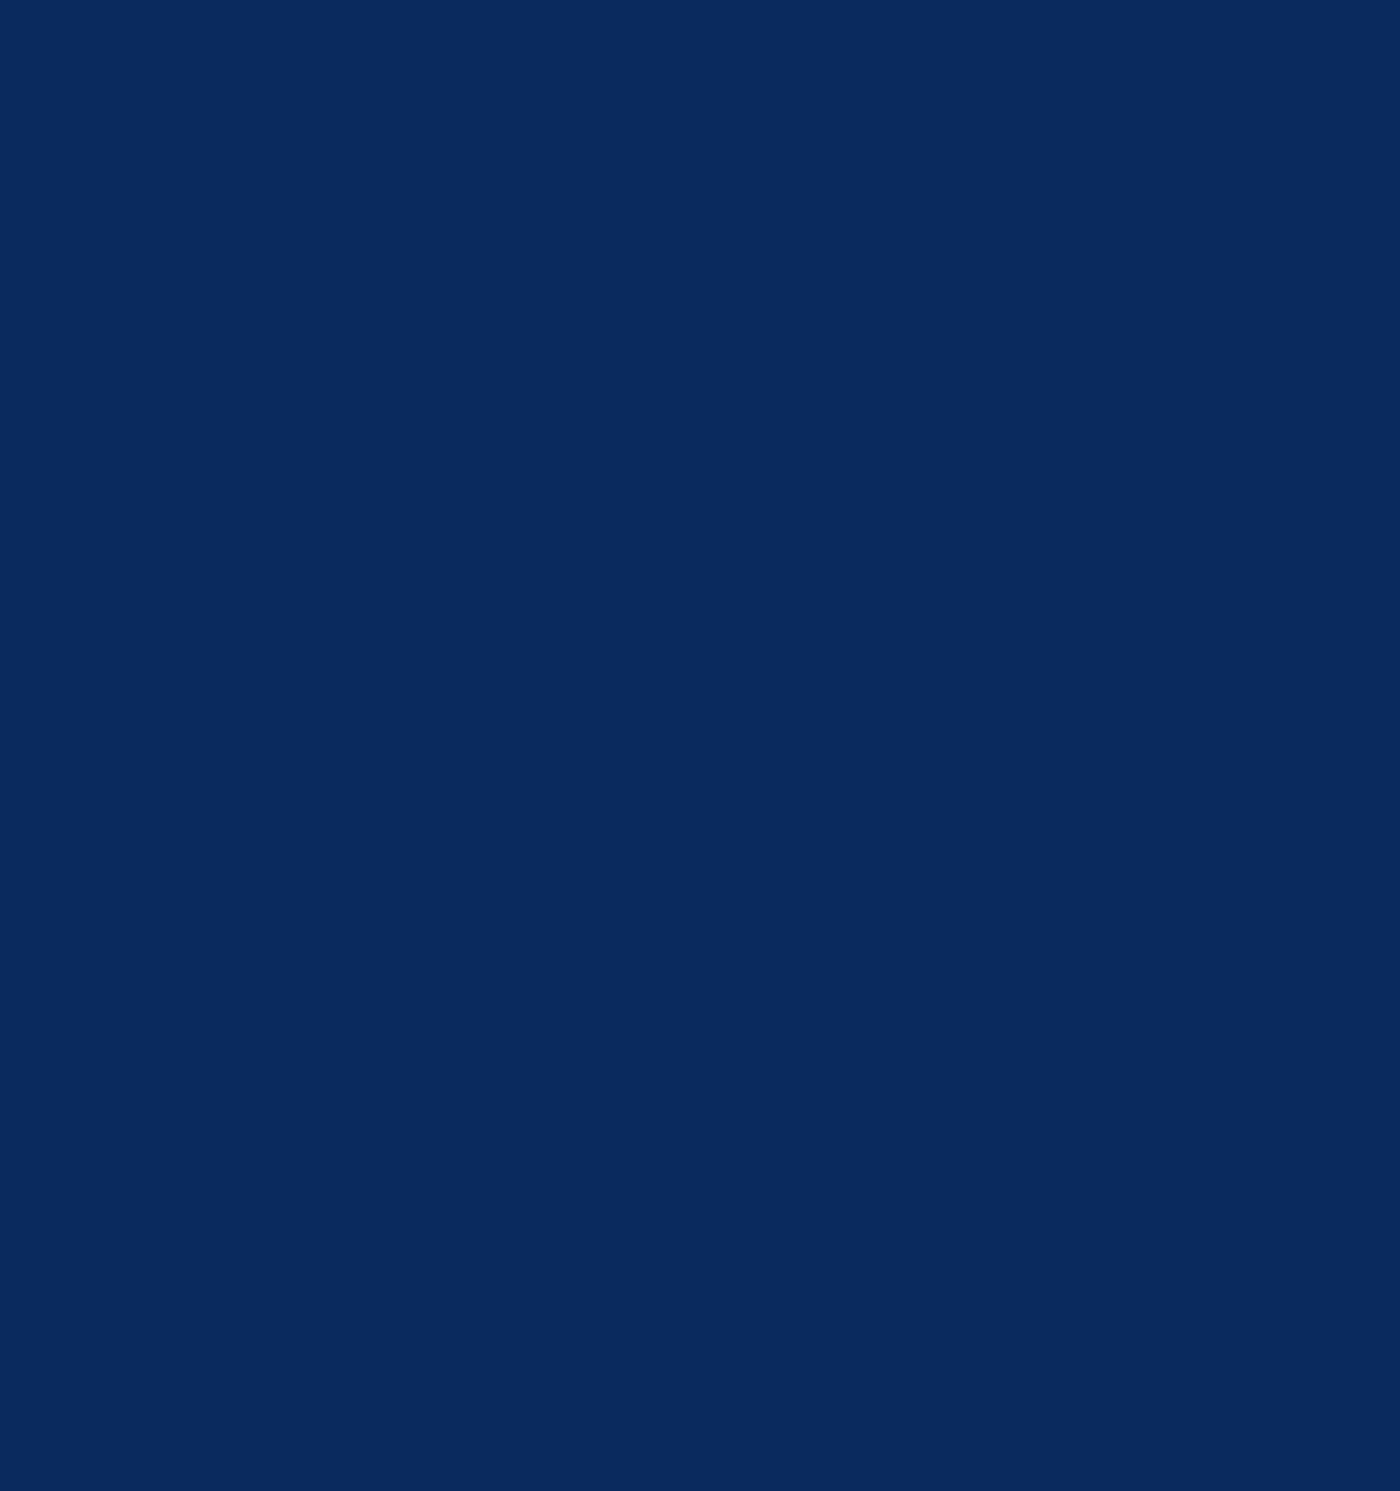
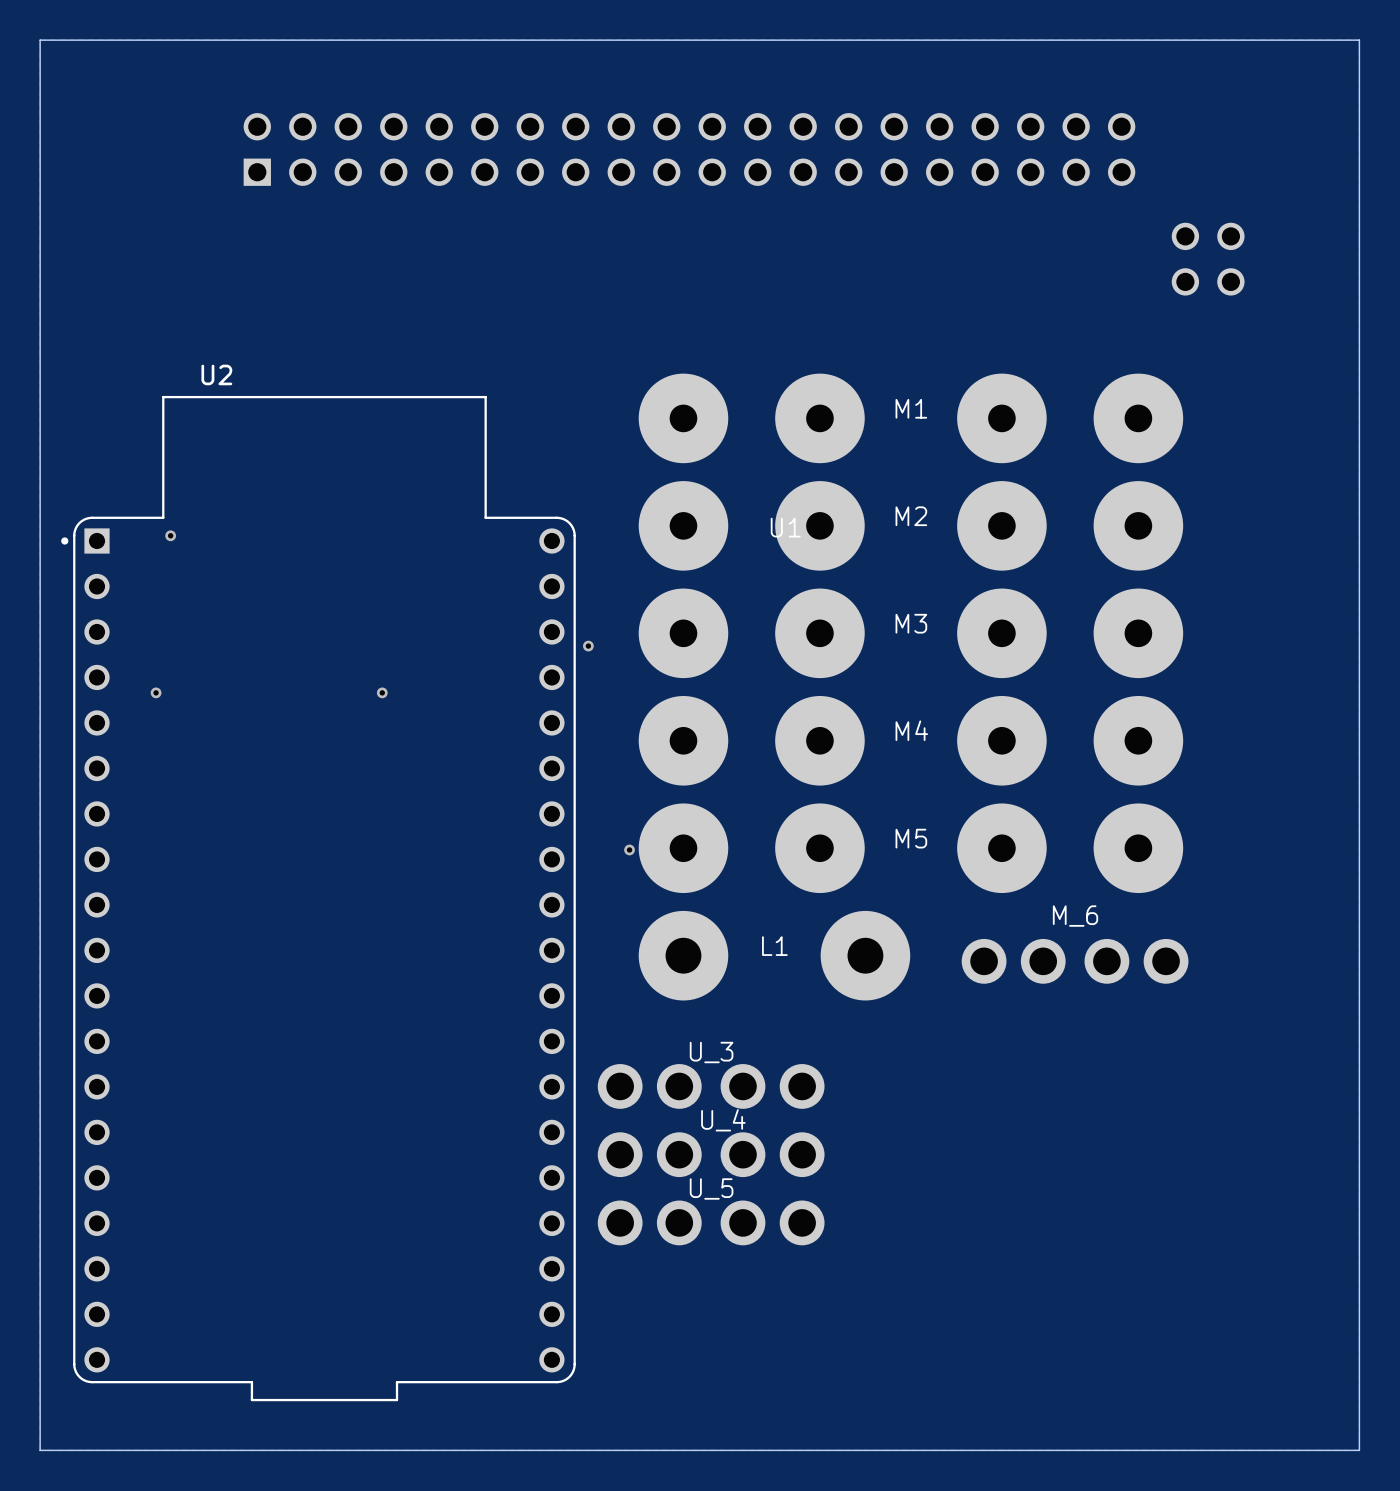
board edge: none -> (40, 40) (40, 1450) (1359, 1450) (1359, 40) (40, 40)
part: none -> (744, 204)
M1: none -> (910, 418)
M2: none -> (910, 525)
via: none -> (170, 535)
M3: none -> (910, 633)
via: none -> (588, 646)
via: none -> (156, 692)
via: none -> (382, 692)
M4: none -> (910, 740)
M5: none -> (910, 848)
via: none -> (629, 849)
U2: none -> (318, 898)
L1: none -> (774, 955)
M_6: none -> (1075, 961)
U_3: none -> (711, 1086)
U_4: none -> (711, 1154)
U_5: none -> (711, 1222)

